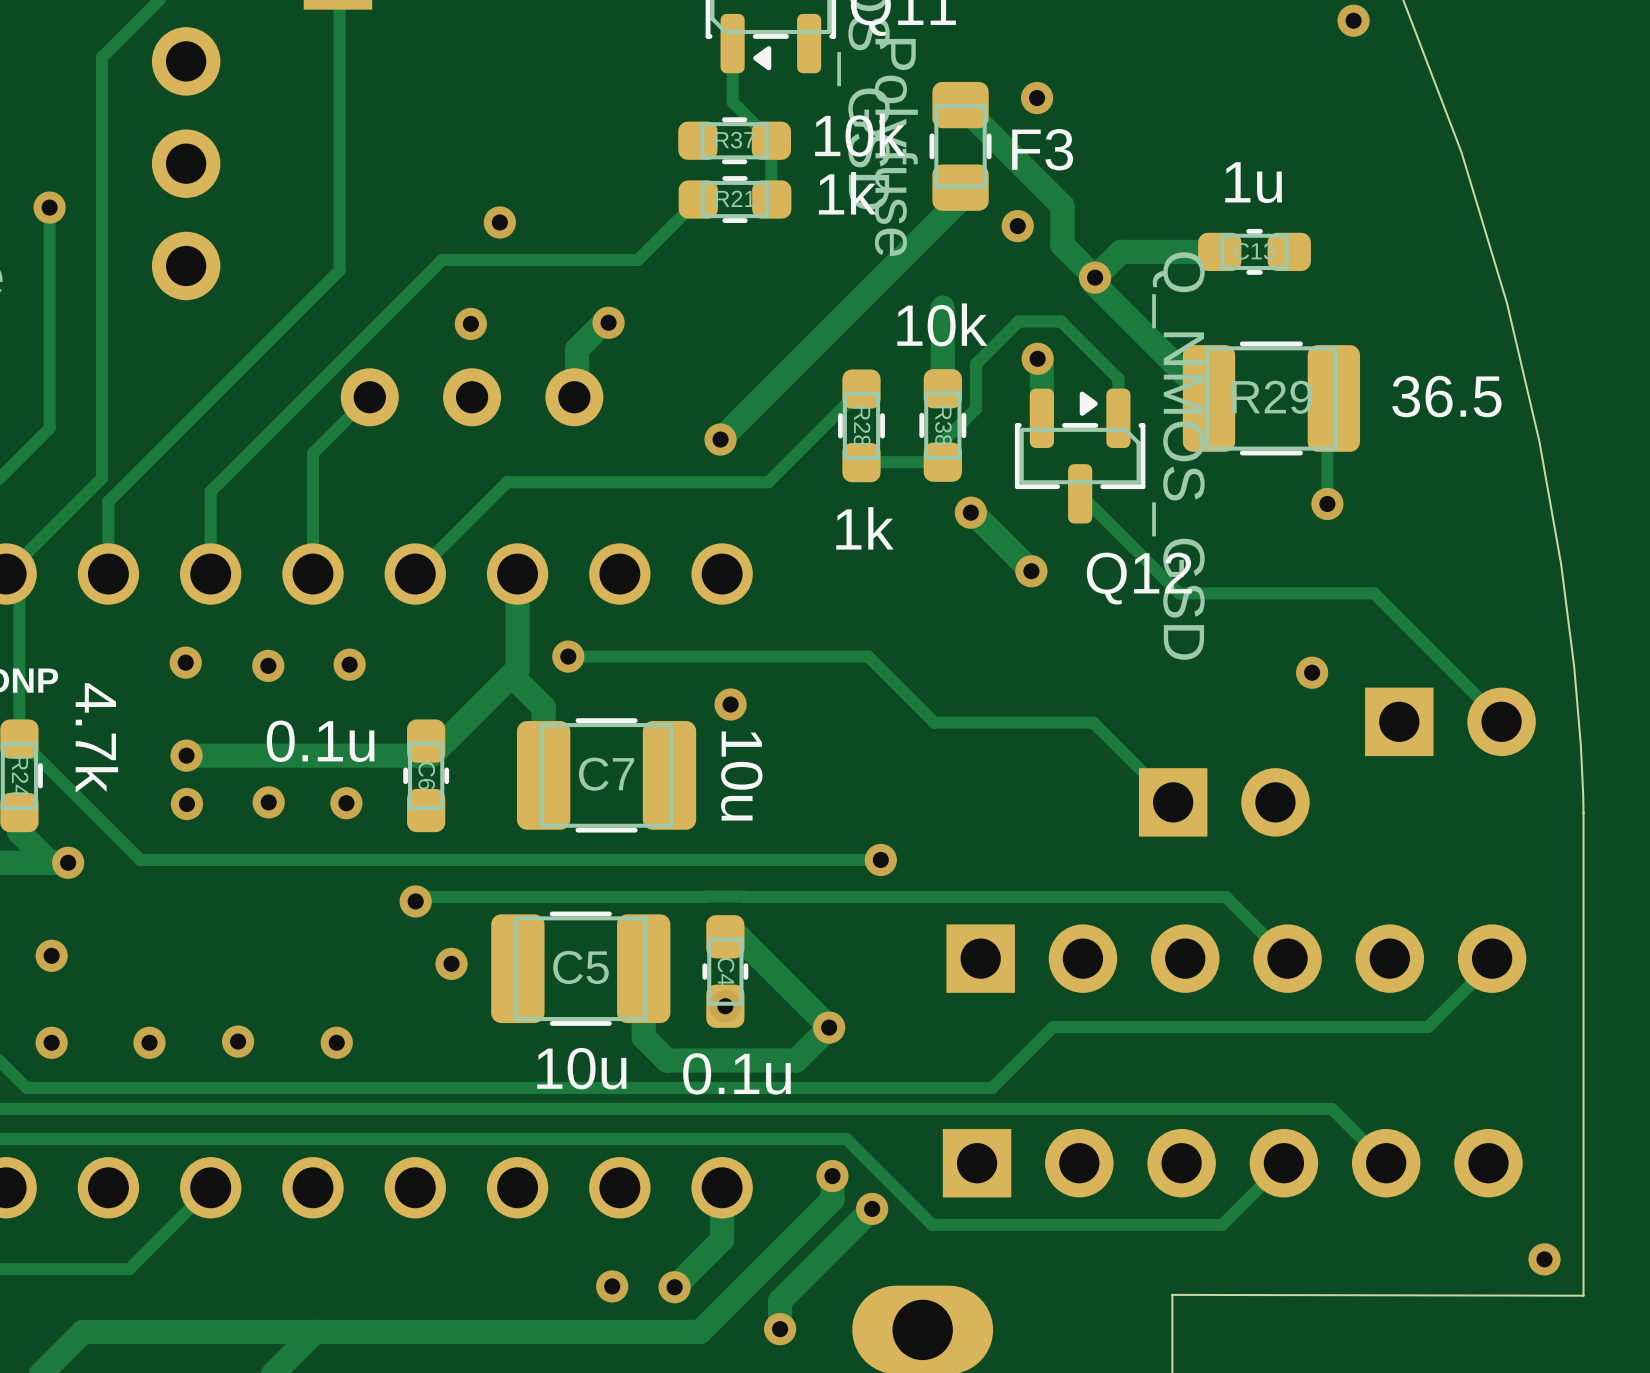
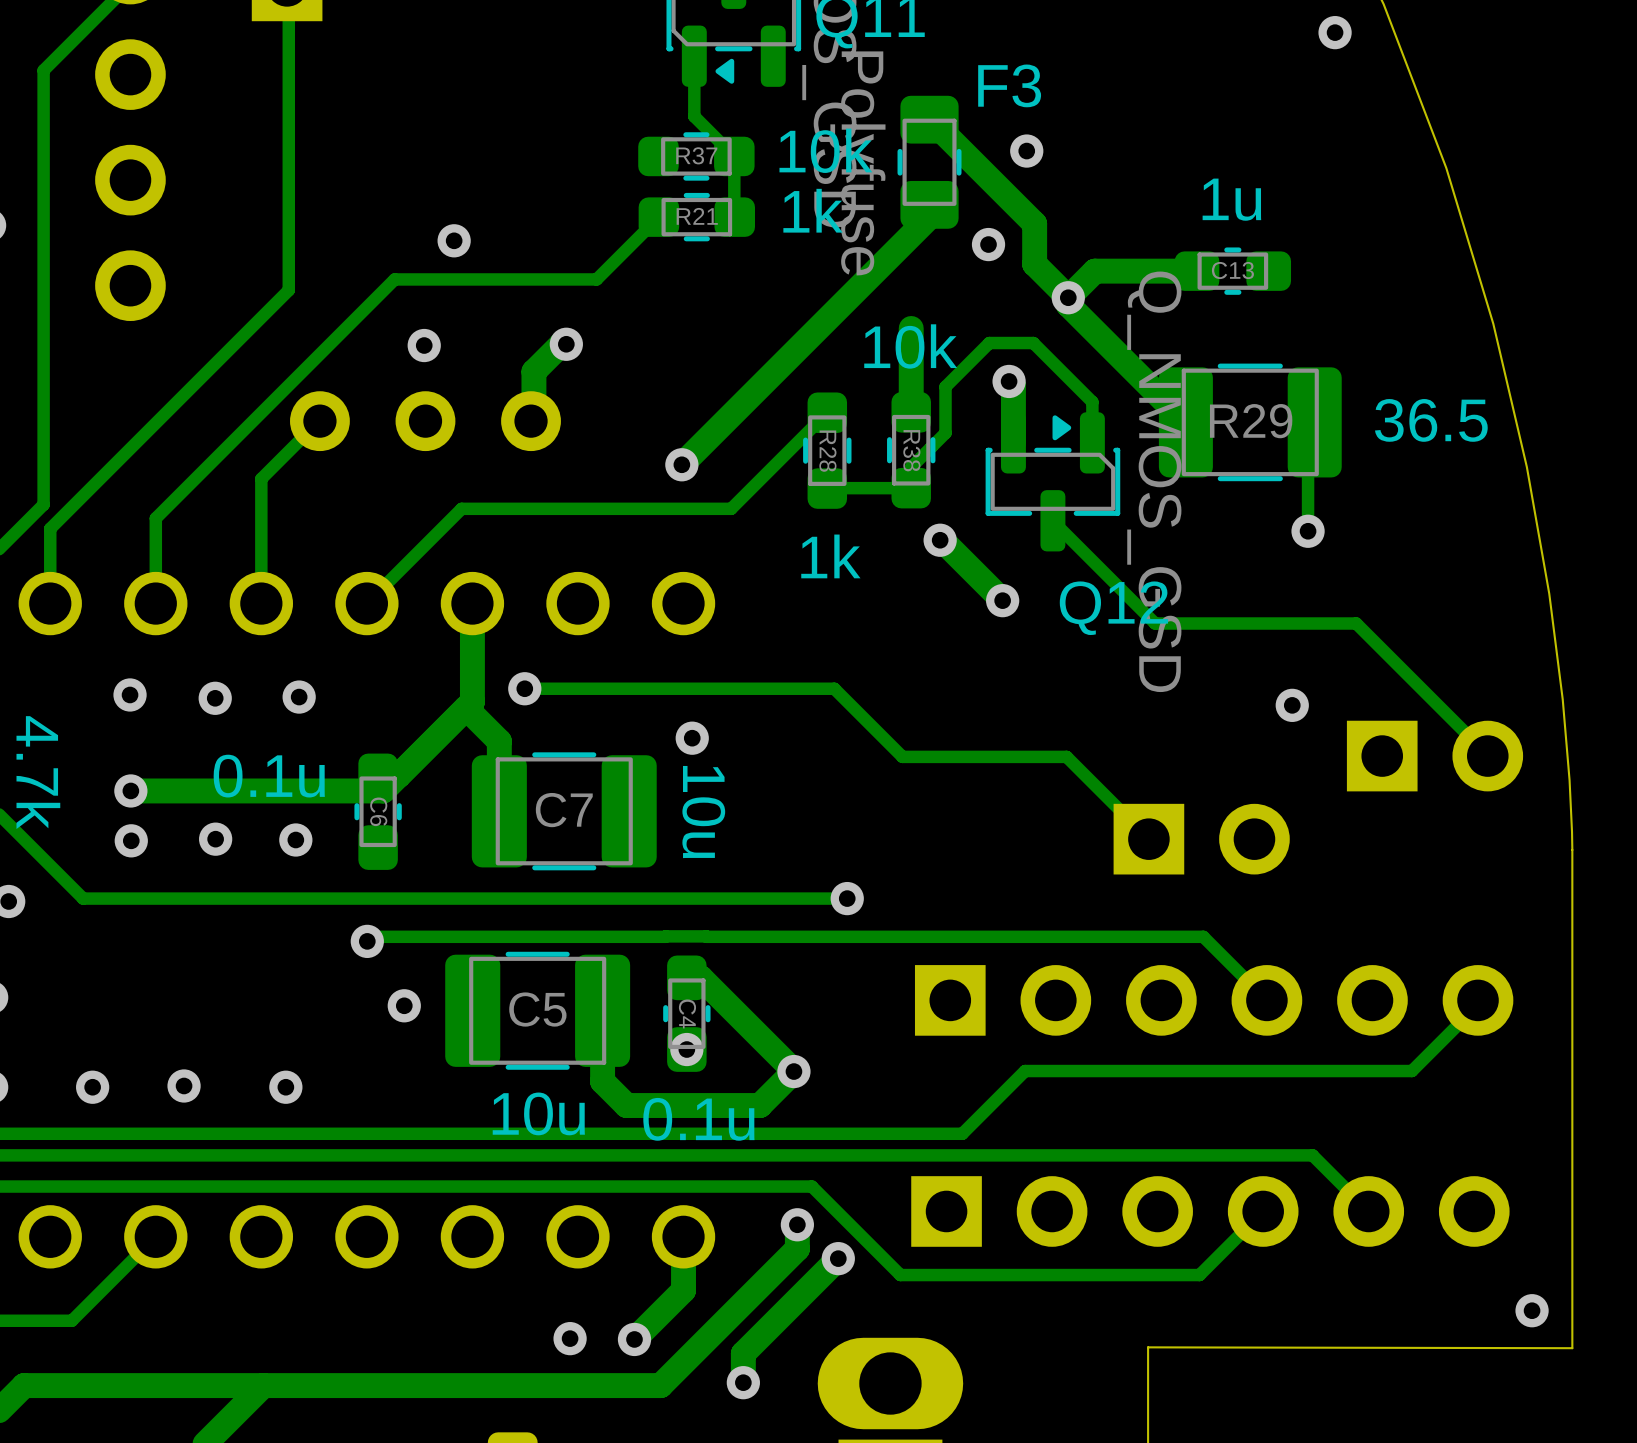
via position: (1037, 98) -> (1026, 151)
F3 name position: F3 (1042, 149) -> F3 (1009, 85)

